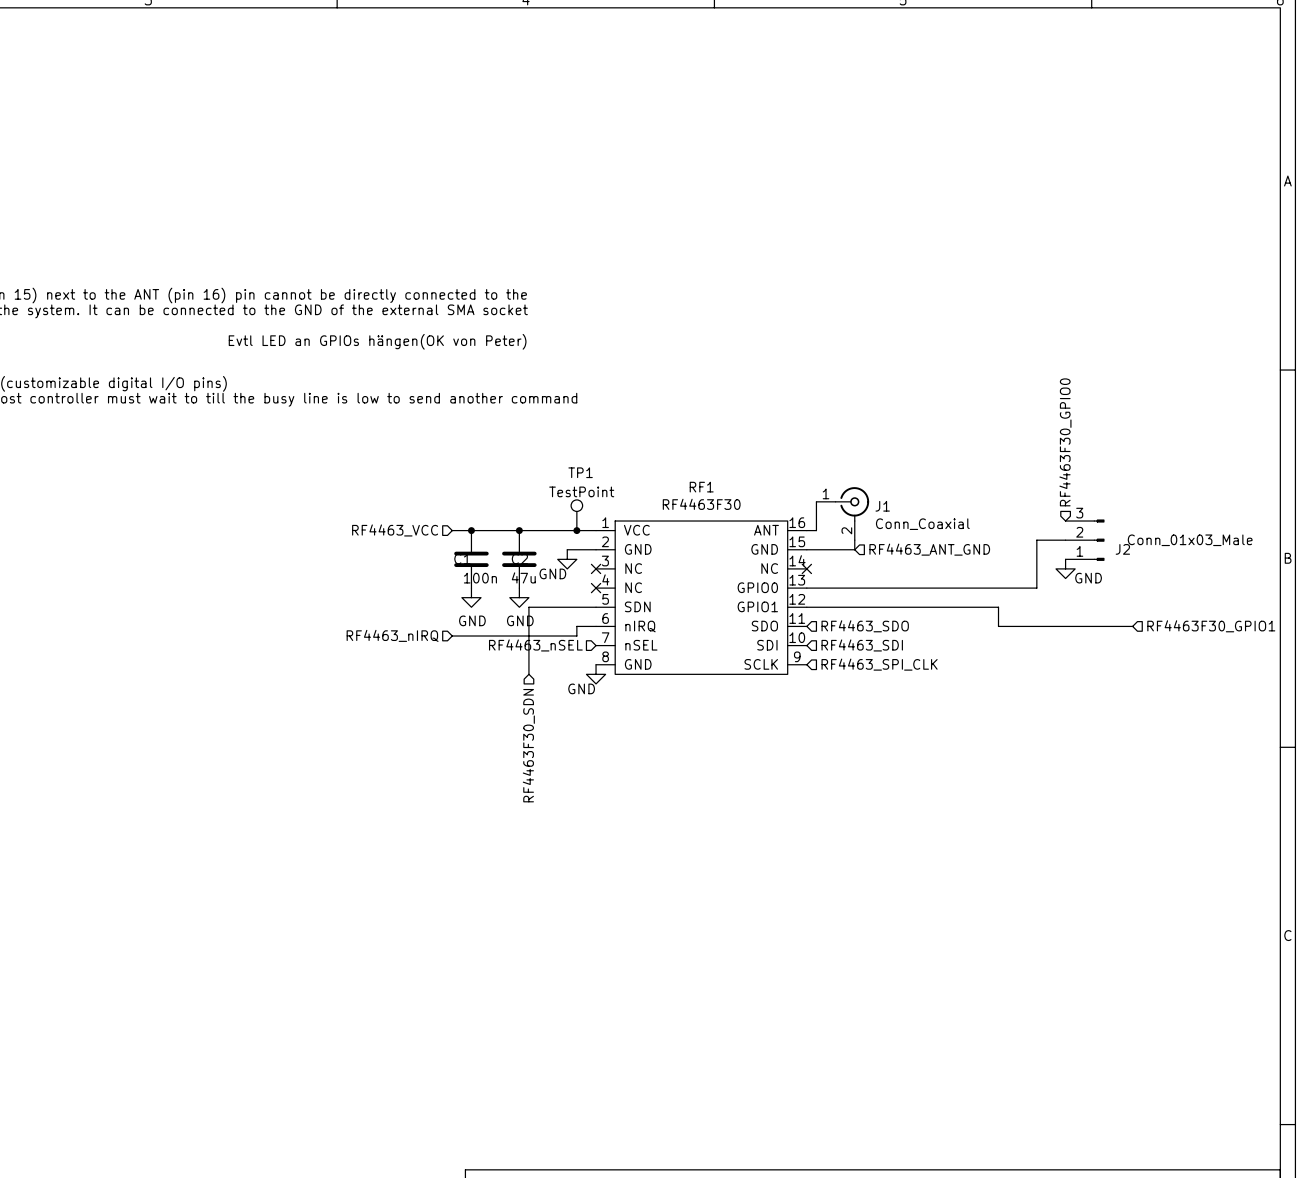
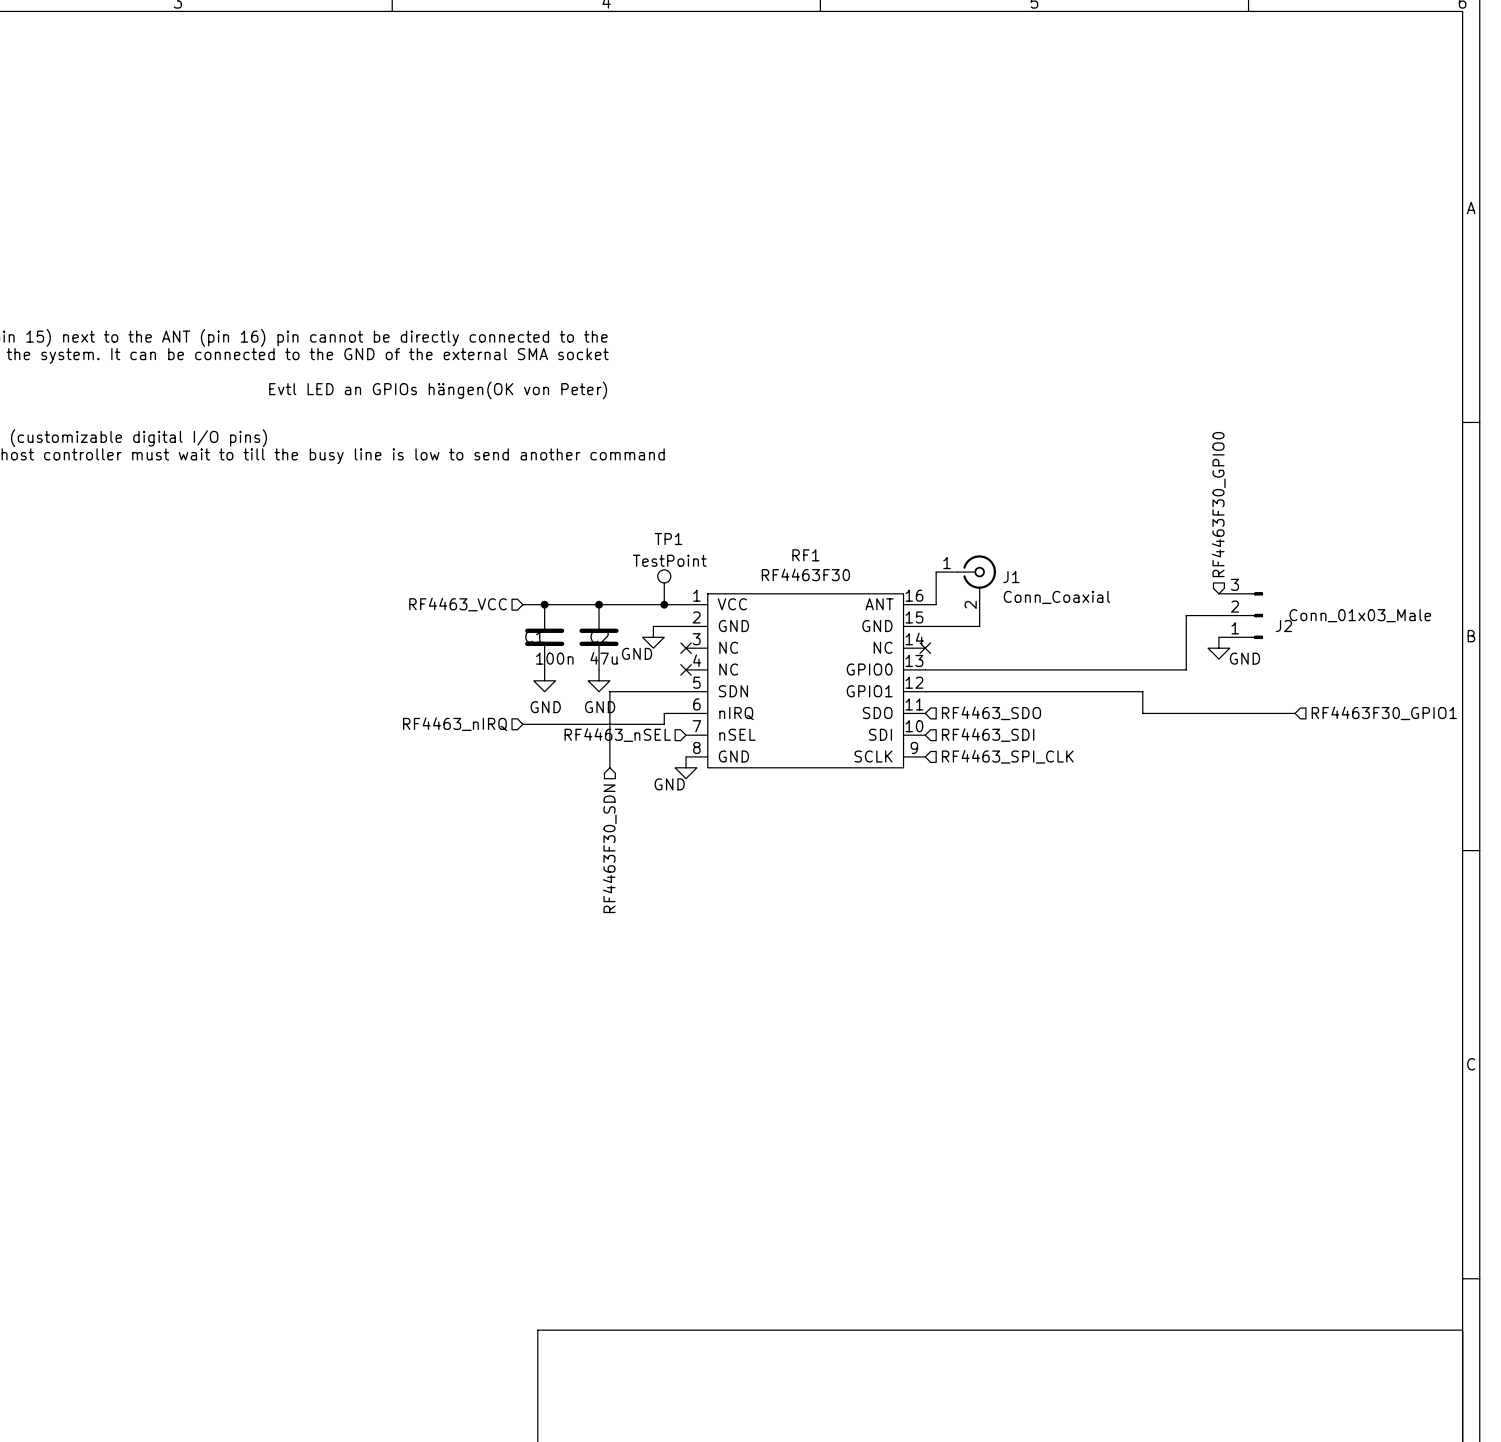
hierarchical label: RF4463_ANT_GND (929, 549) -> none

